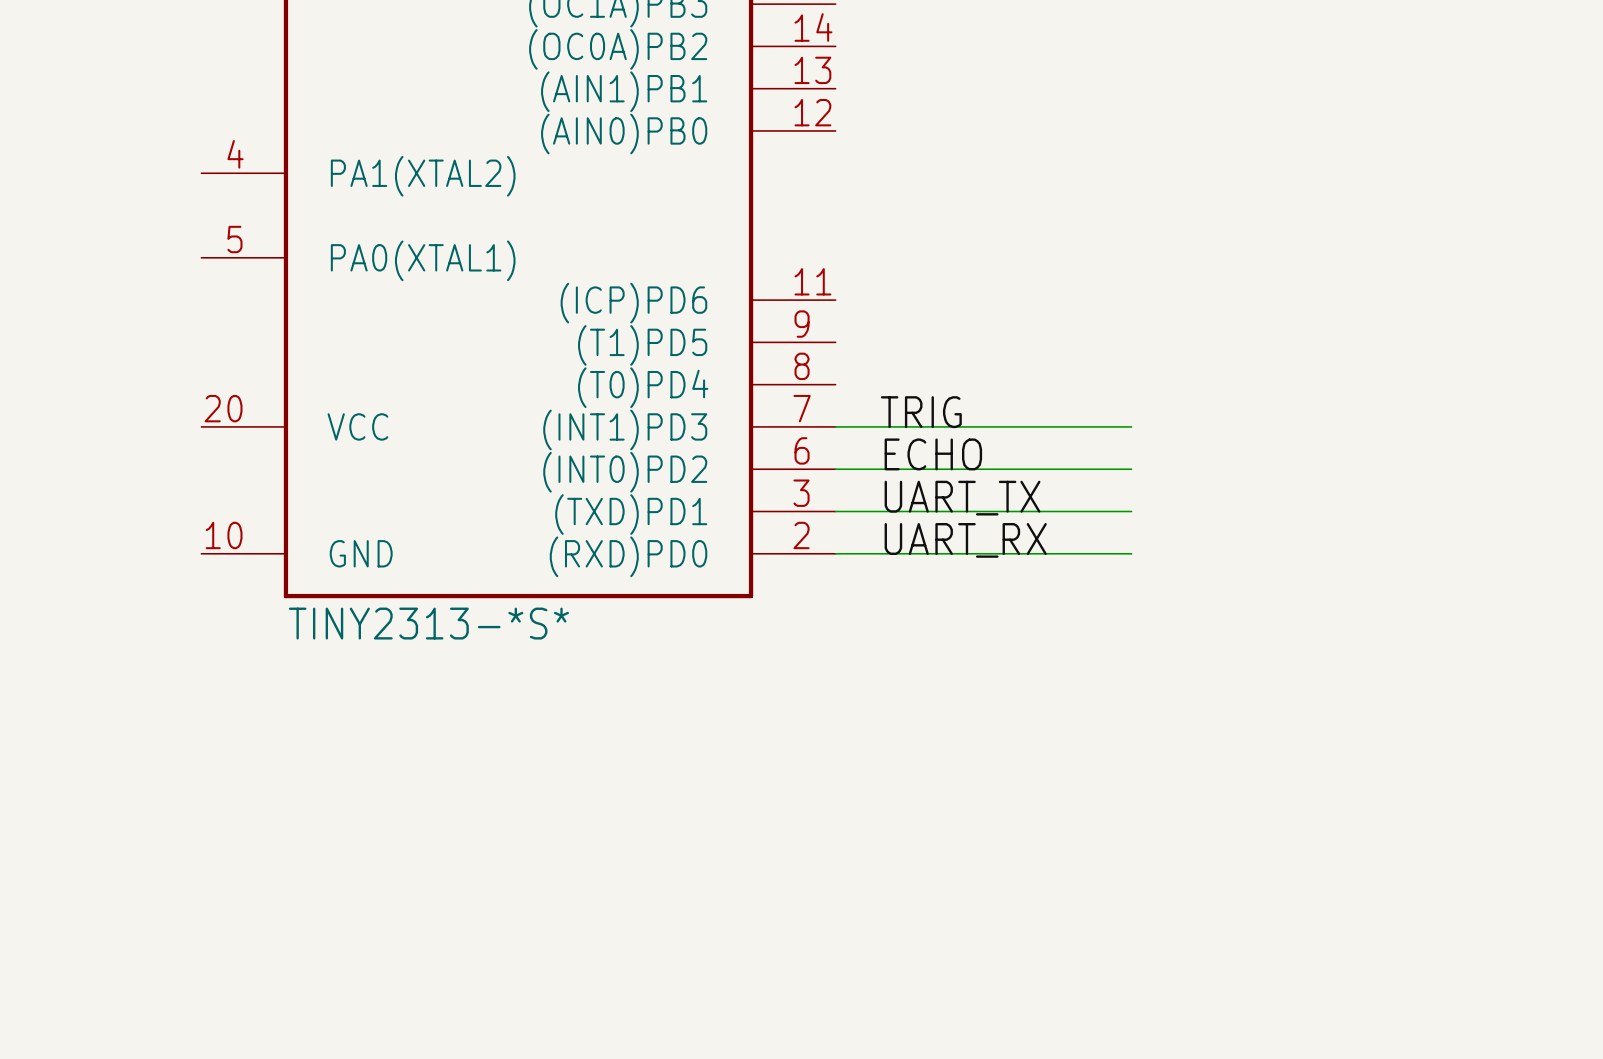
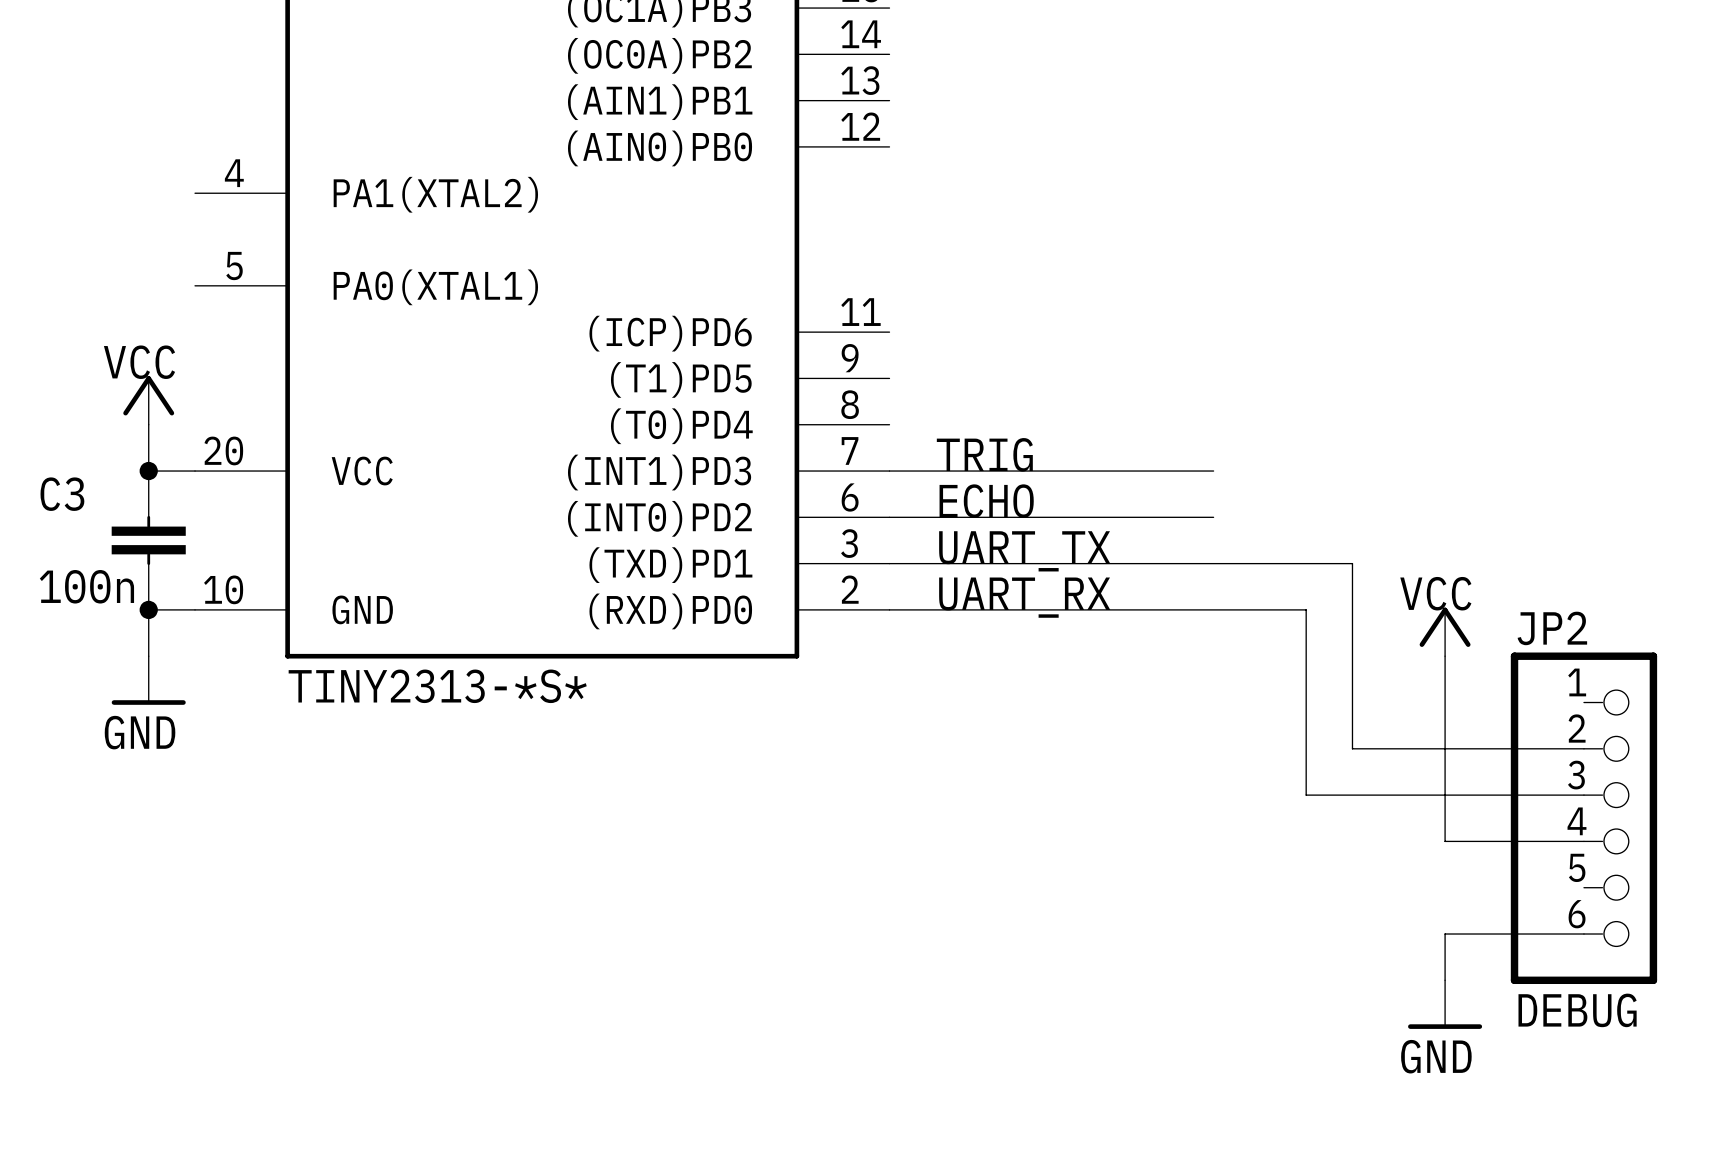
power symbol: none -> VCC (148, 400)
wire: none -> (148, 424) (148, 471) (195, 471)
junction: none -> (148, 471)
C3: none -> 100n (148, 540)
wire: none -> (1213, 563) (1352, 563) (1352, 748) (1583, 748)
junction: none -> (148, 609)
wire: none -> (195, 609) (148, 609) (148, 656)
wire: none -> (1213, 609) (1306, 609) (1306, 795) (1583, 795)
power symbol: none -> VCC (1445, 631)
wire: none -> (1445, 656) (1445, 841) (1583, 841)
power symbol: none -> GND (148, 680)
JP2: none -> DEBUG (1583, 818)
wire: none -> (1583, 934) (1445, 934) (1445, 980)
power symbol: none -> GND (1445, 1004)

